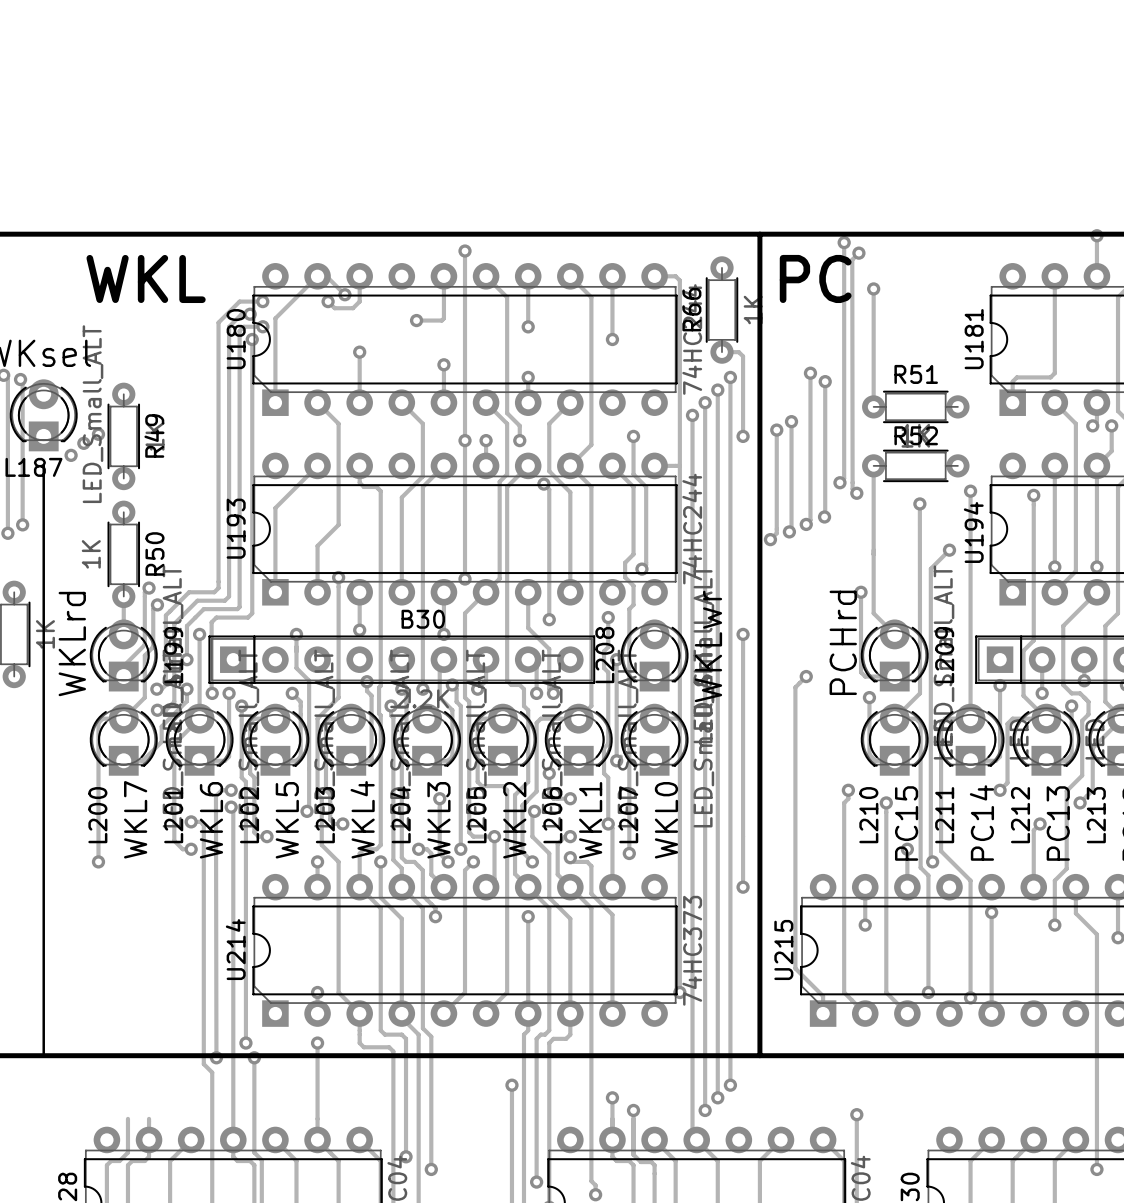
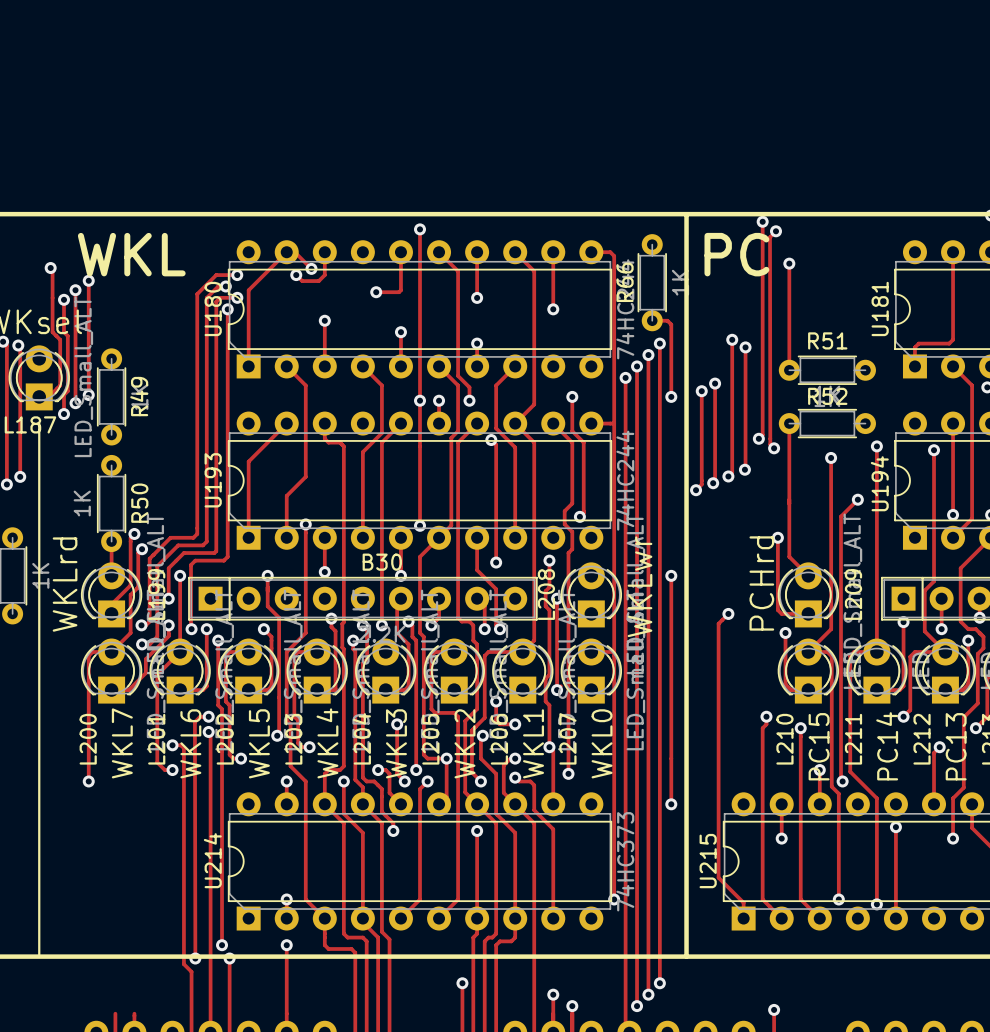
track: none -> (50, 268) (52, 269) (52, 332) (60, 339) (60, 385) (48, 396) (39, 396)
via: none -> (50, 268)
track: none -> (88, 280) (88, 395)
via: none -> (88, 280)
track: none -> (75, 290) (75, 403)
via: none -> (75, 290)
track: none -> (64, 299) (64, 332) (67, 335) (67, 391) (64, 395) (64, 414)
via: none -> (64, 299)

